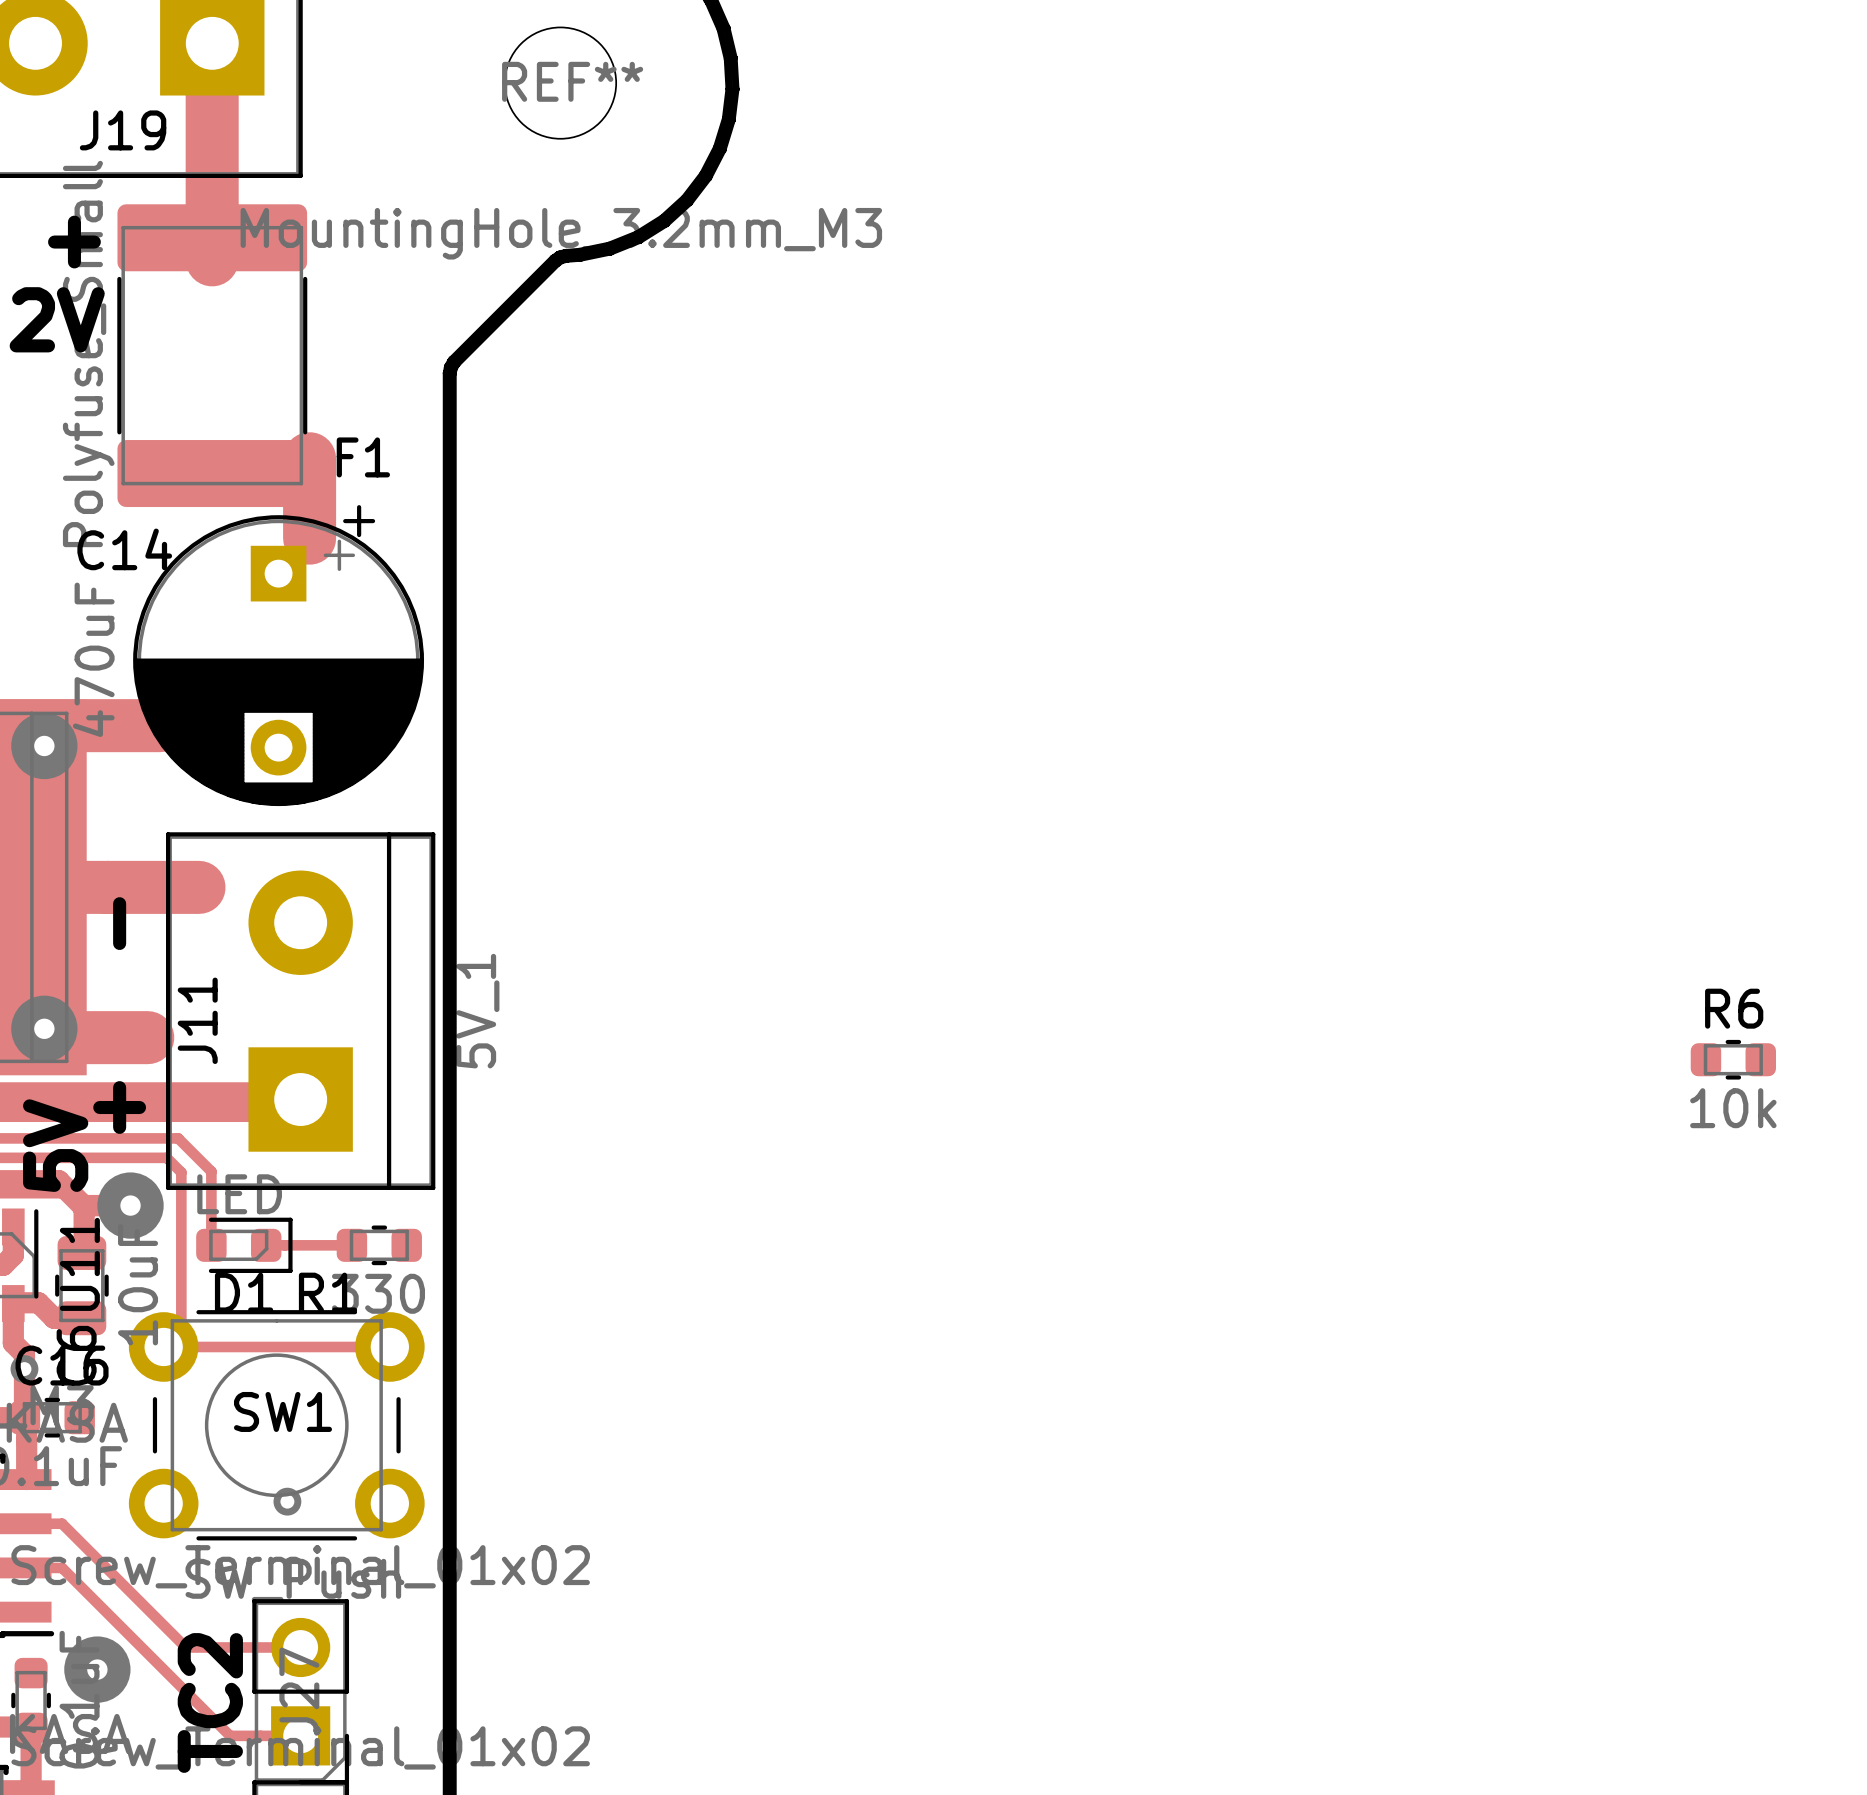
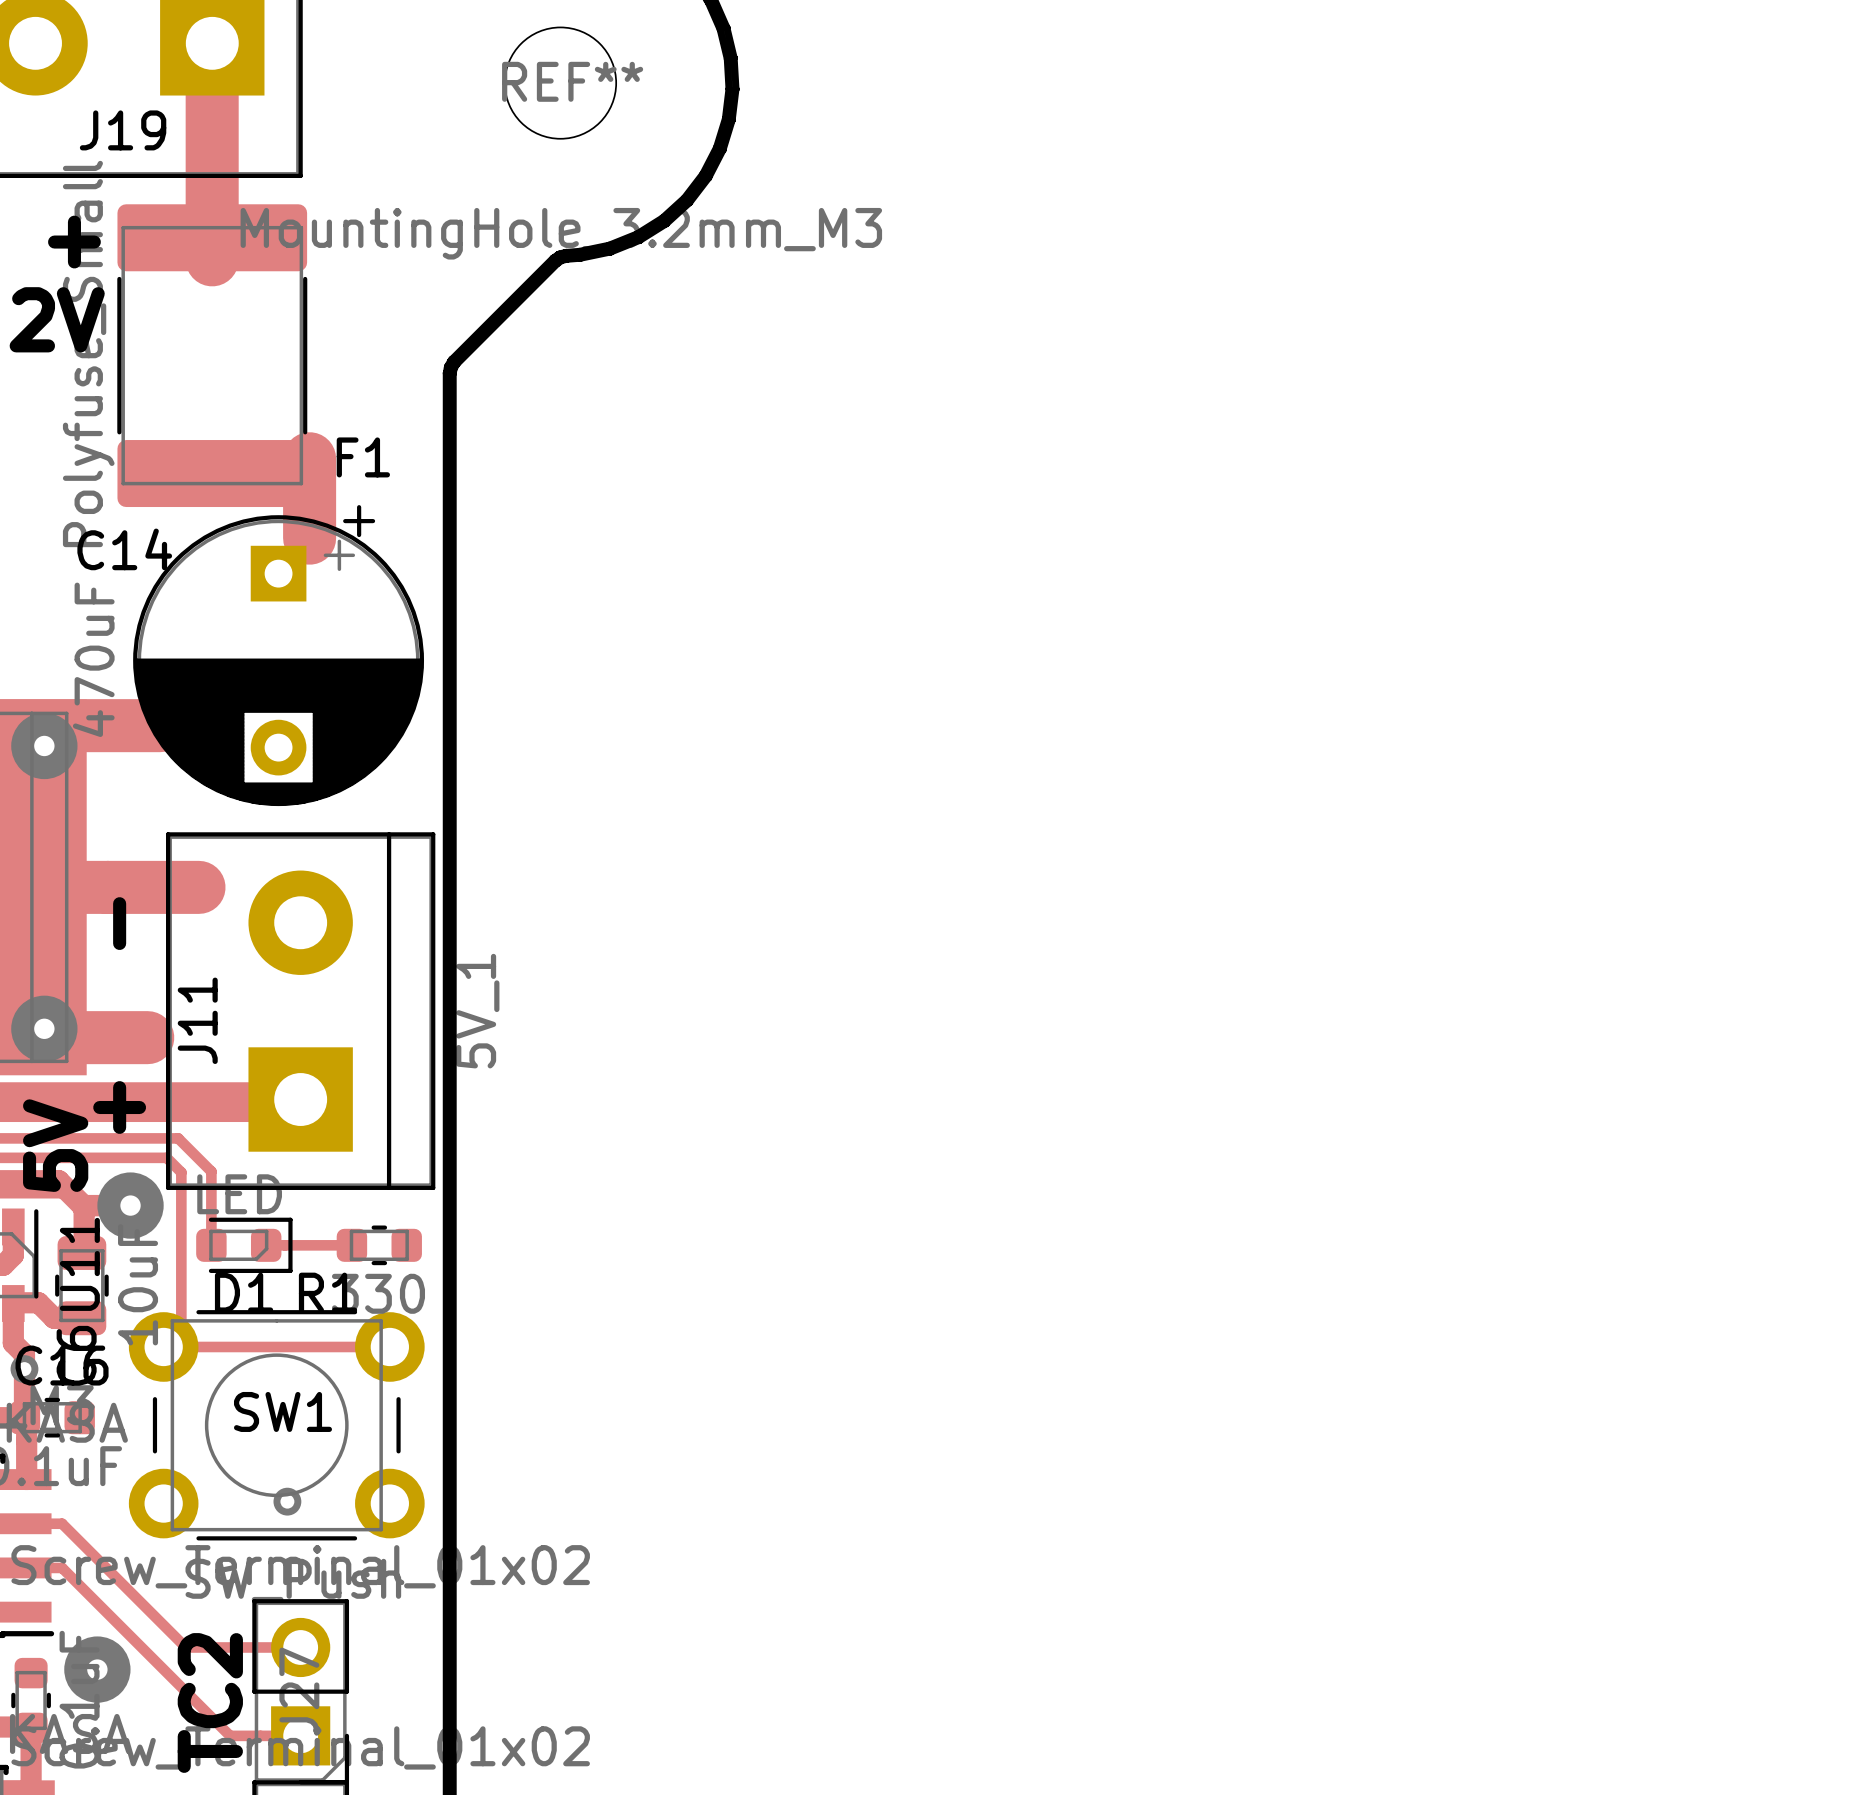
R6: 10k (1733, 1059) -> none

